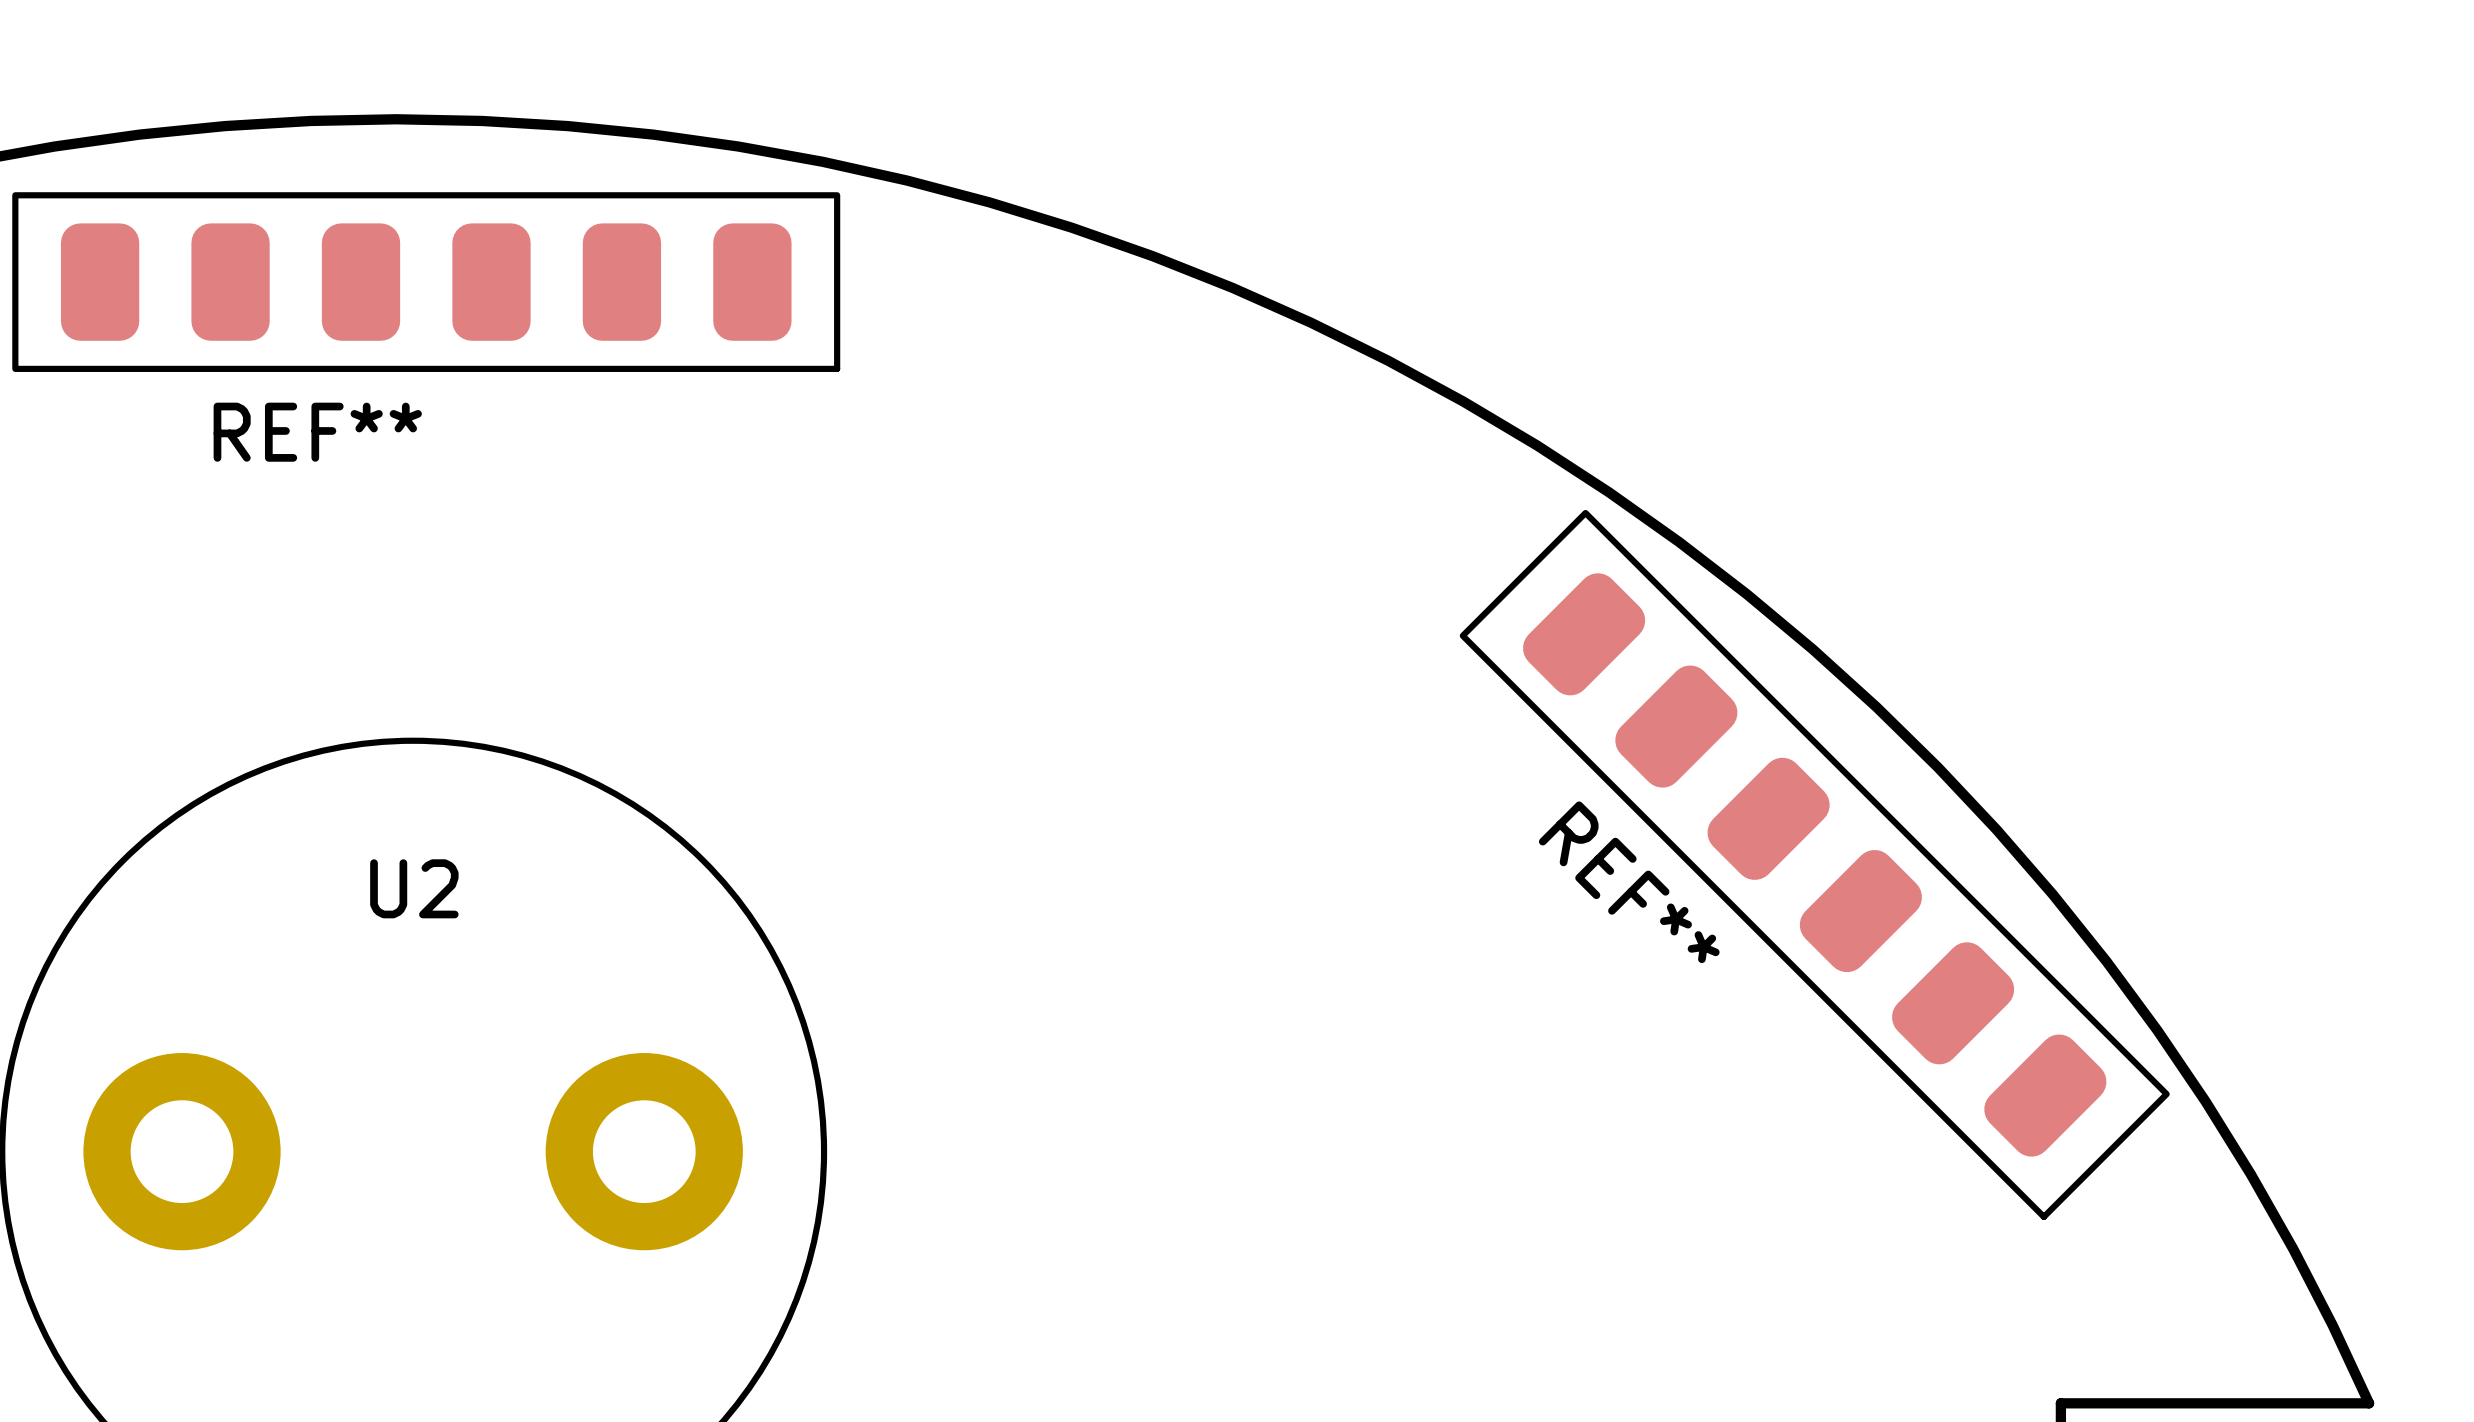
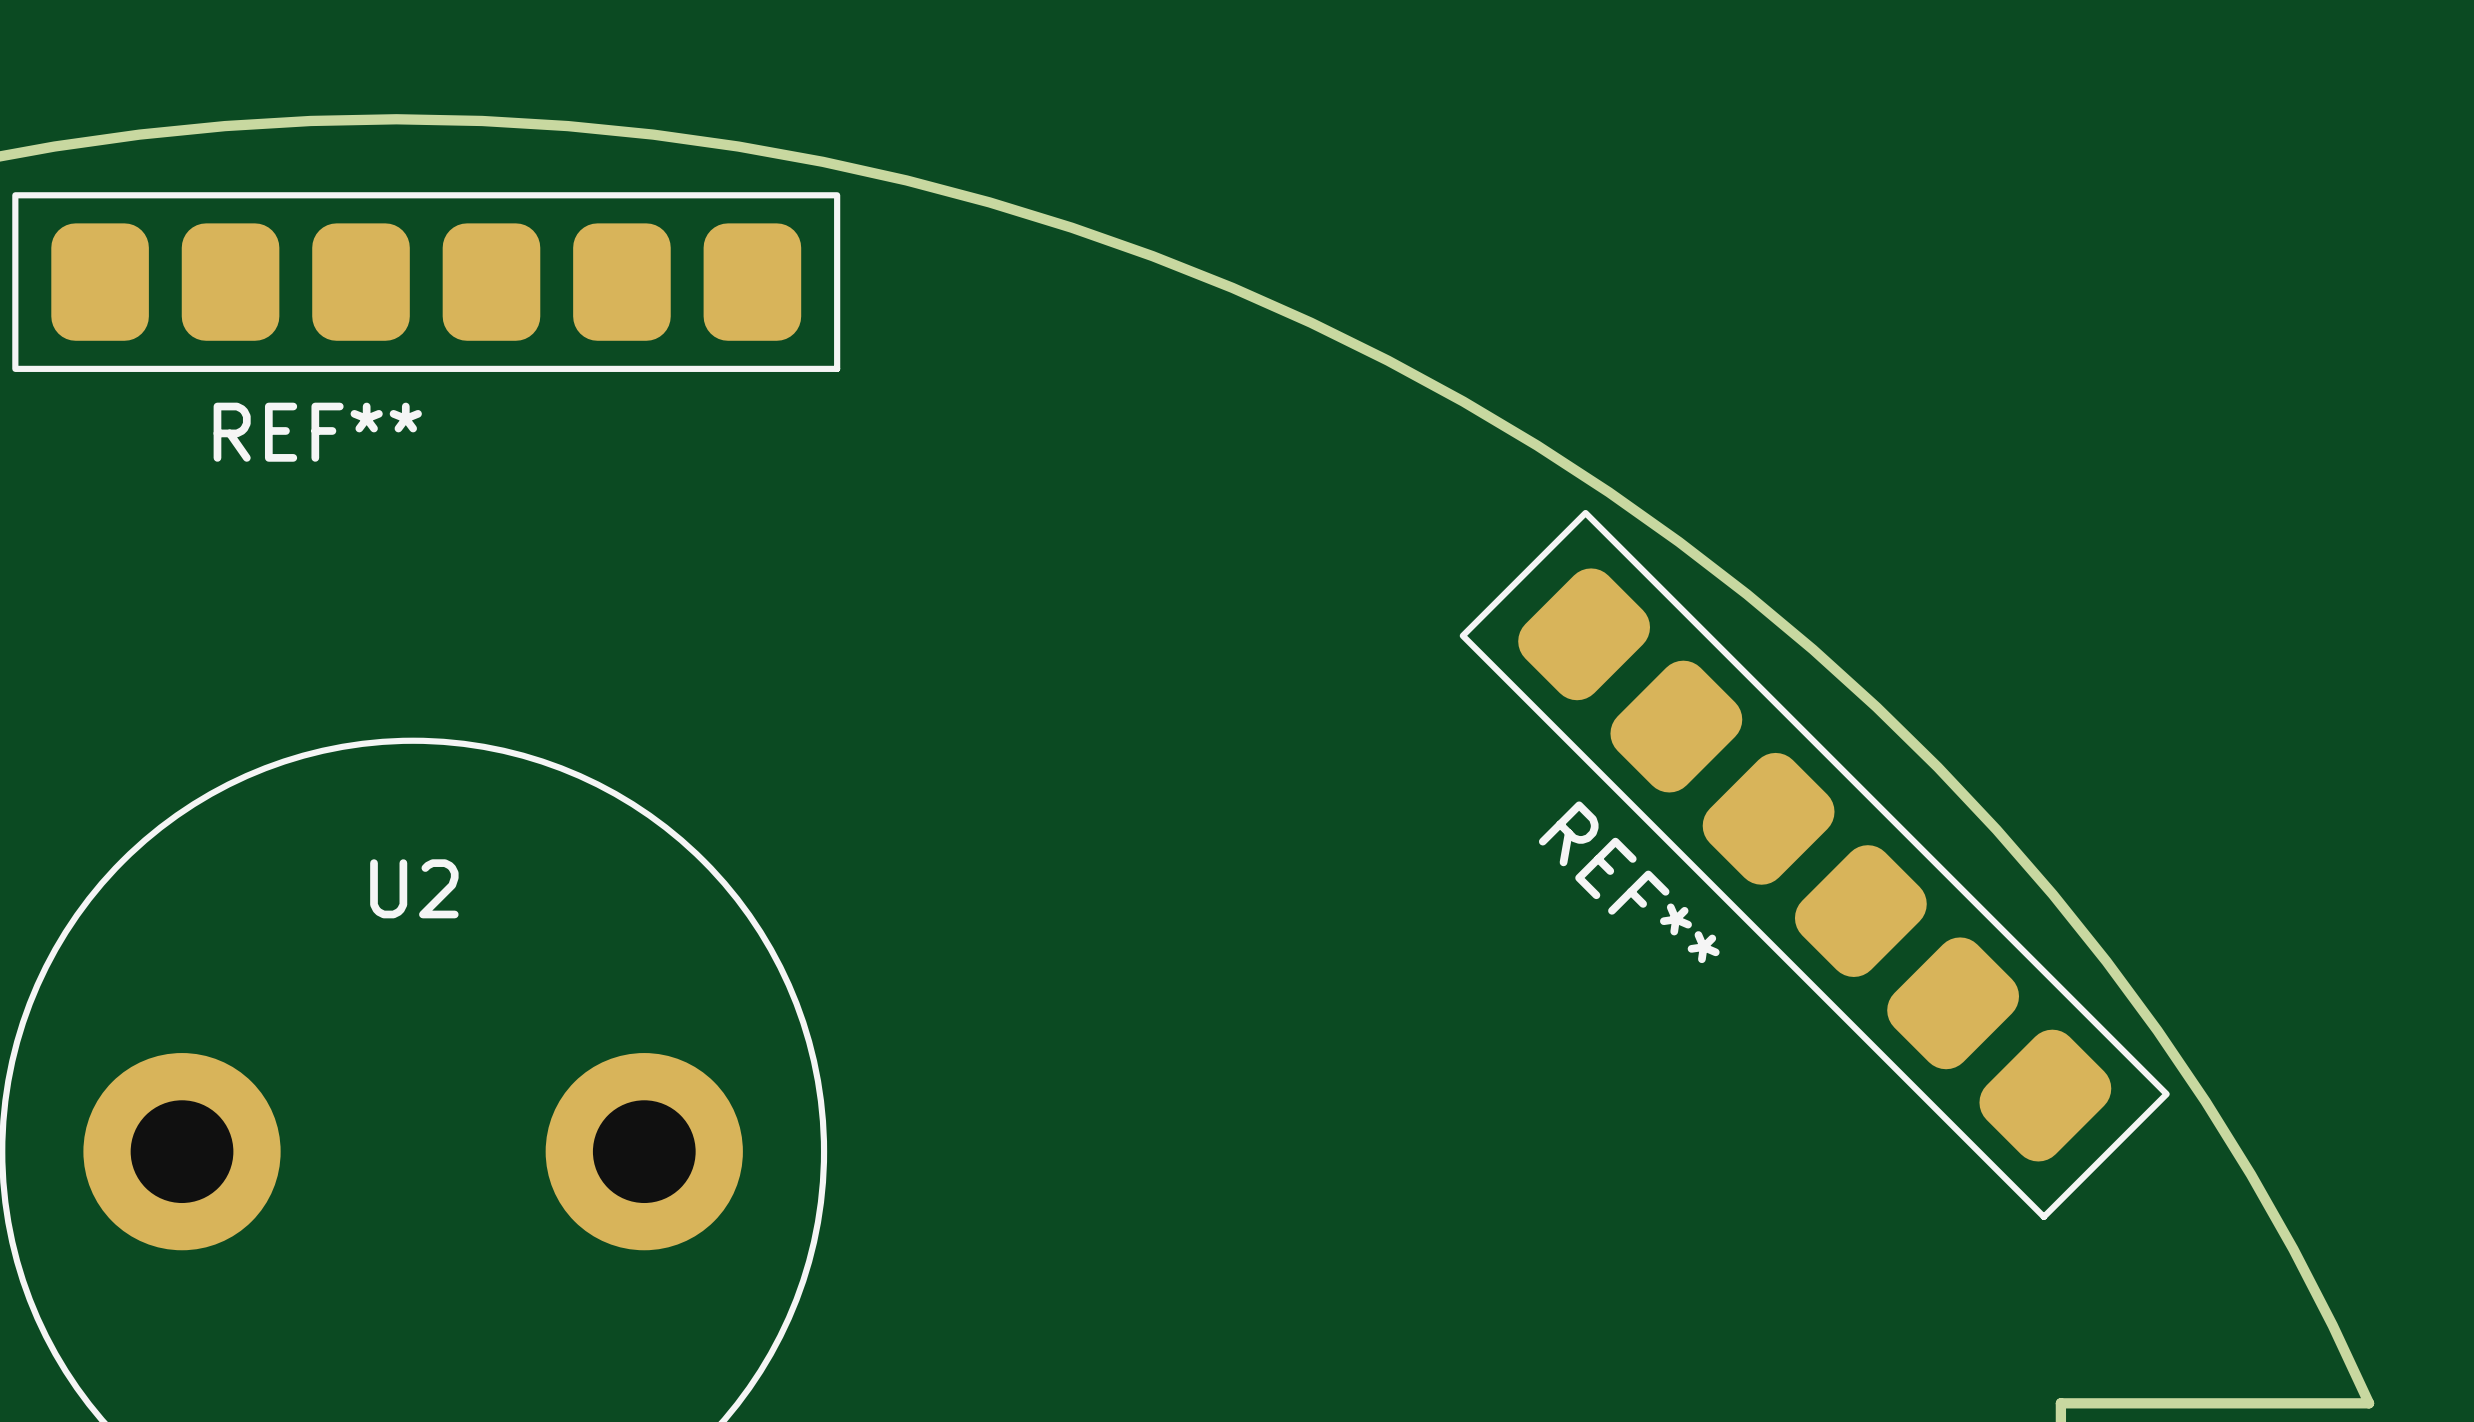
REF** footprint: [12, 192, 841, 372] -> [12, 192, 841, 372]
REF** footprint: [1459, 509, 2170, 1220] -> [1459, 509, 2170, 1220]

